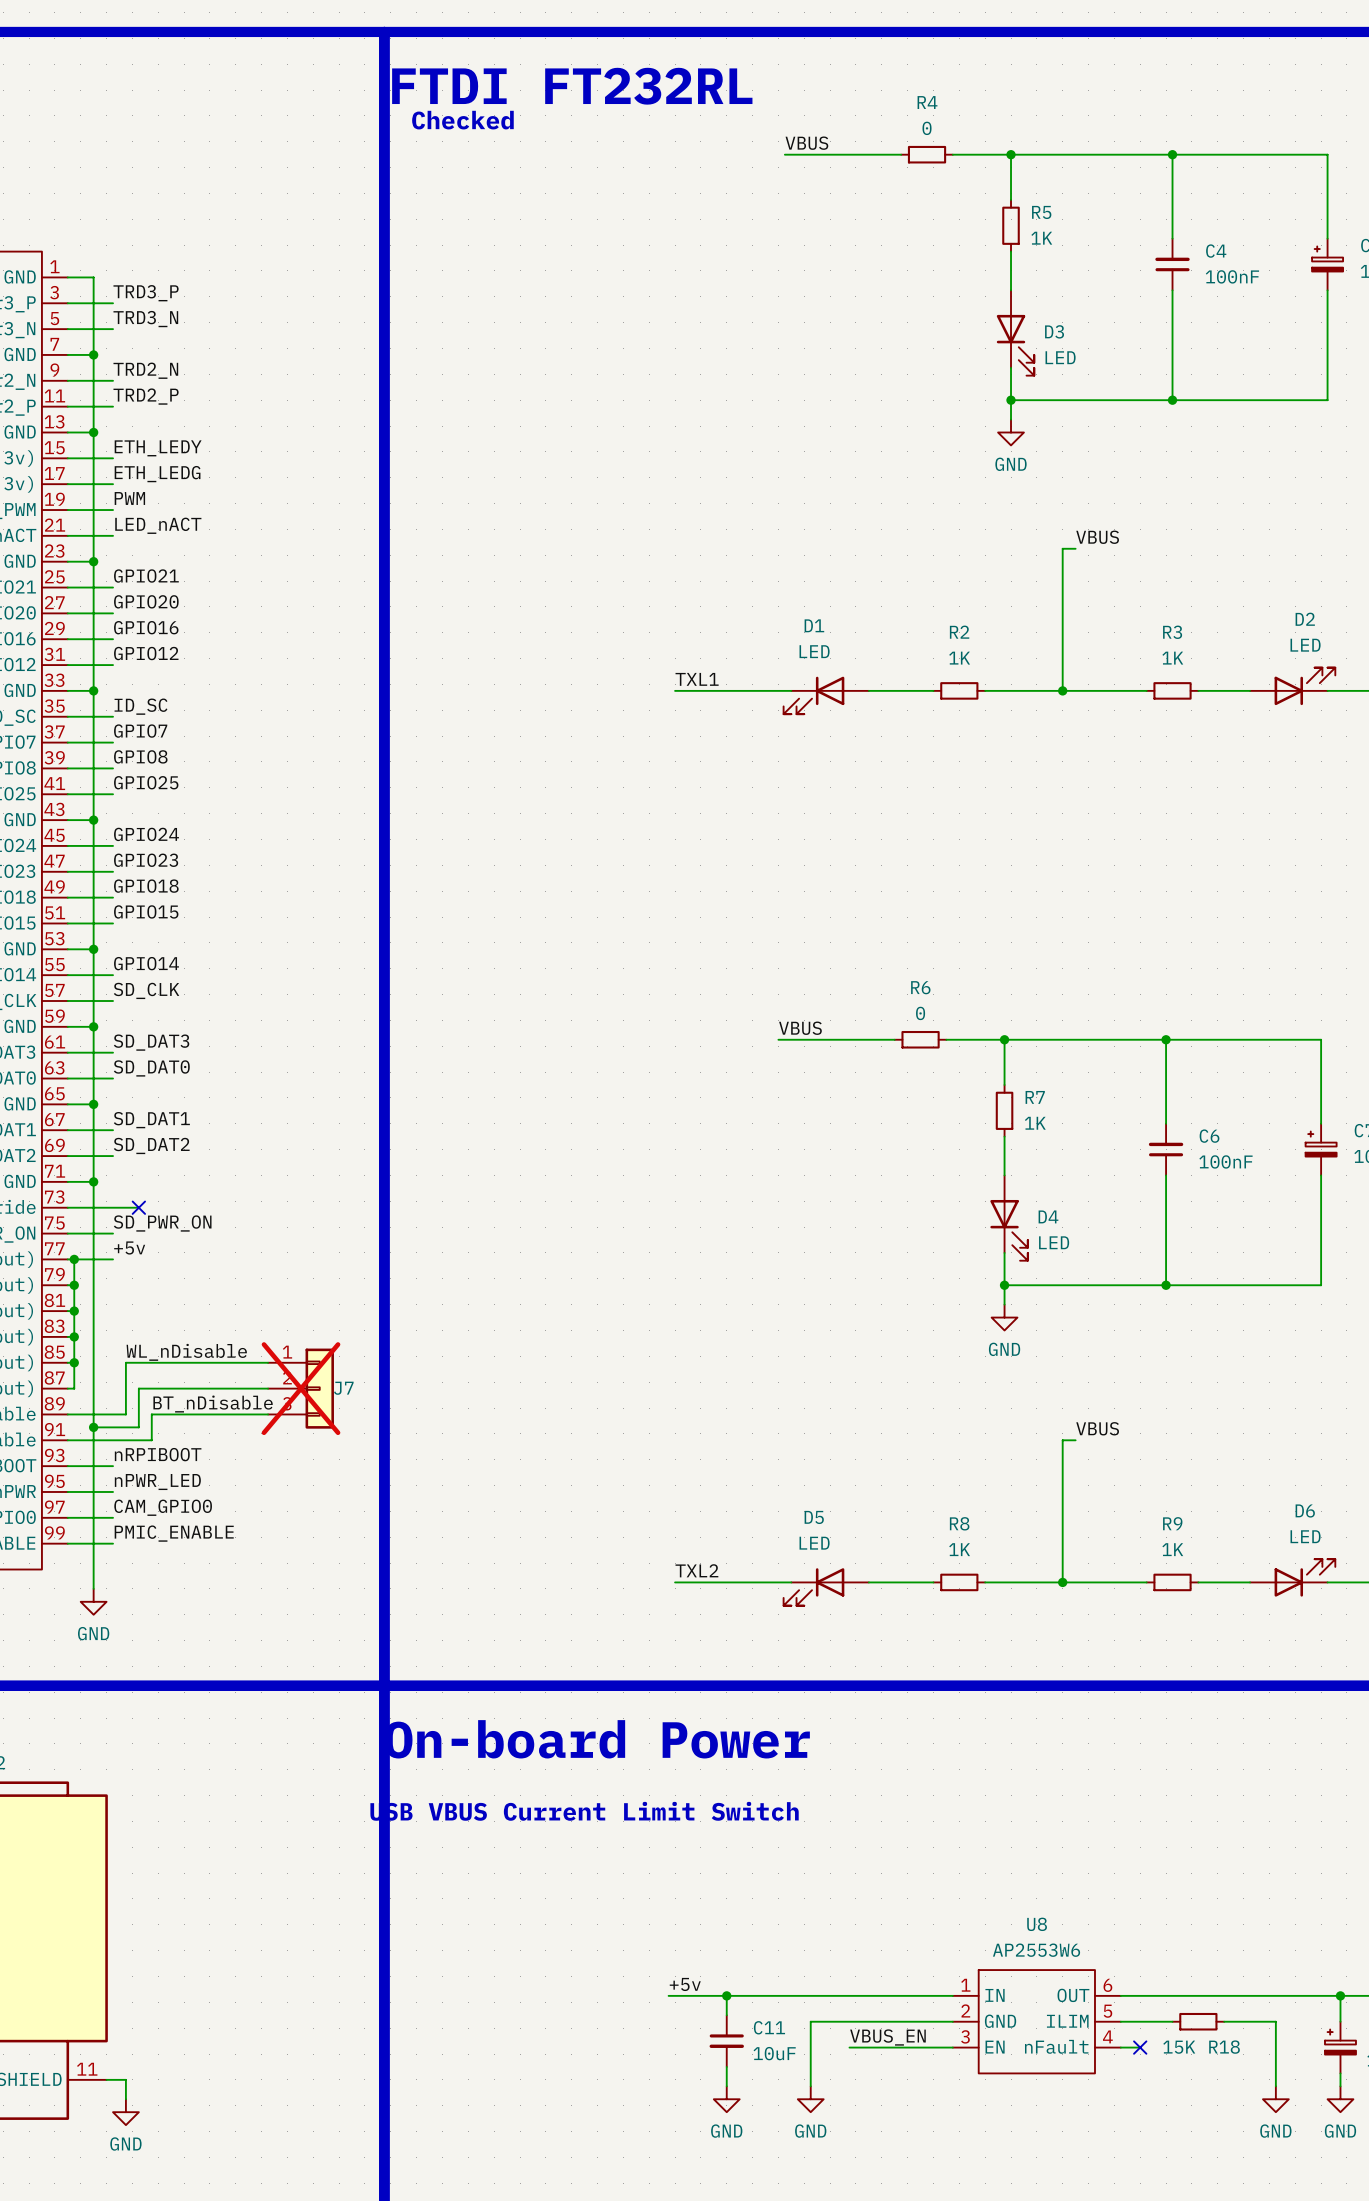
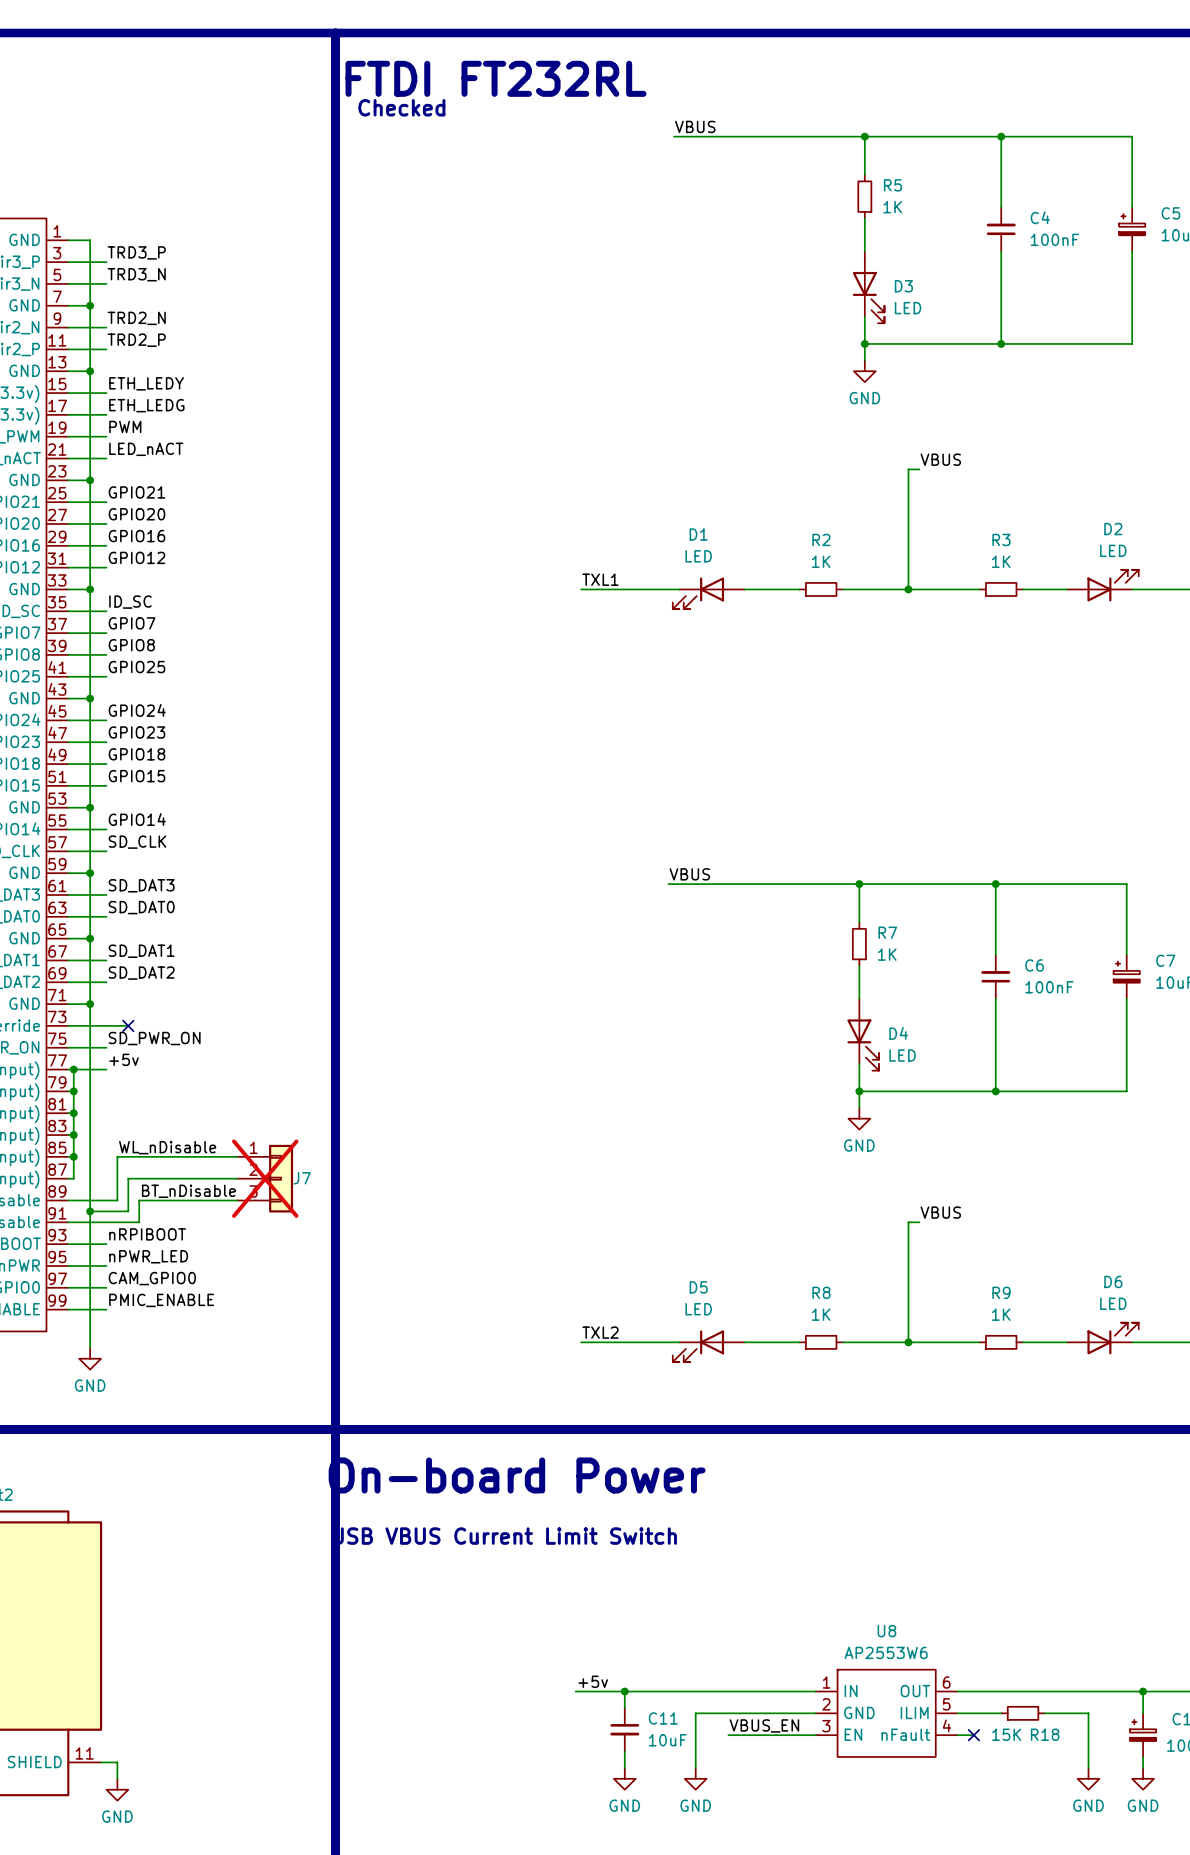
wire: none -> (772, 136) (815, 136)
R4: 0 (927, 154) -> none
wire: none -> (766, 884) (810, 884)
R6: 0 (920, 1039) -> none

